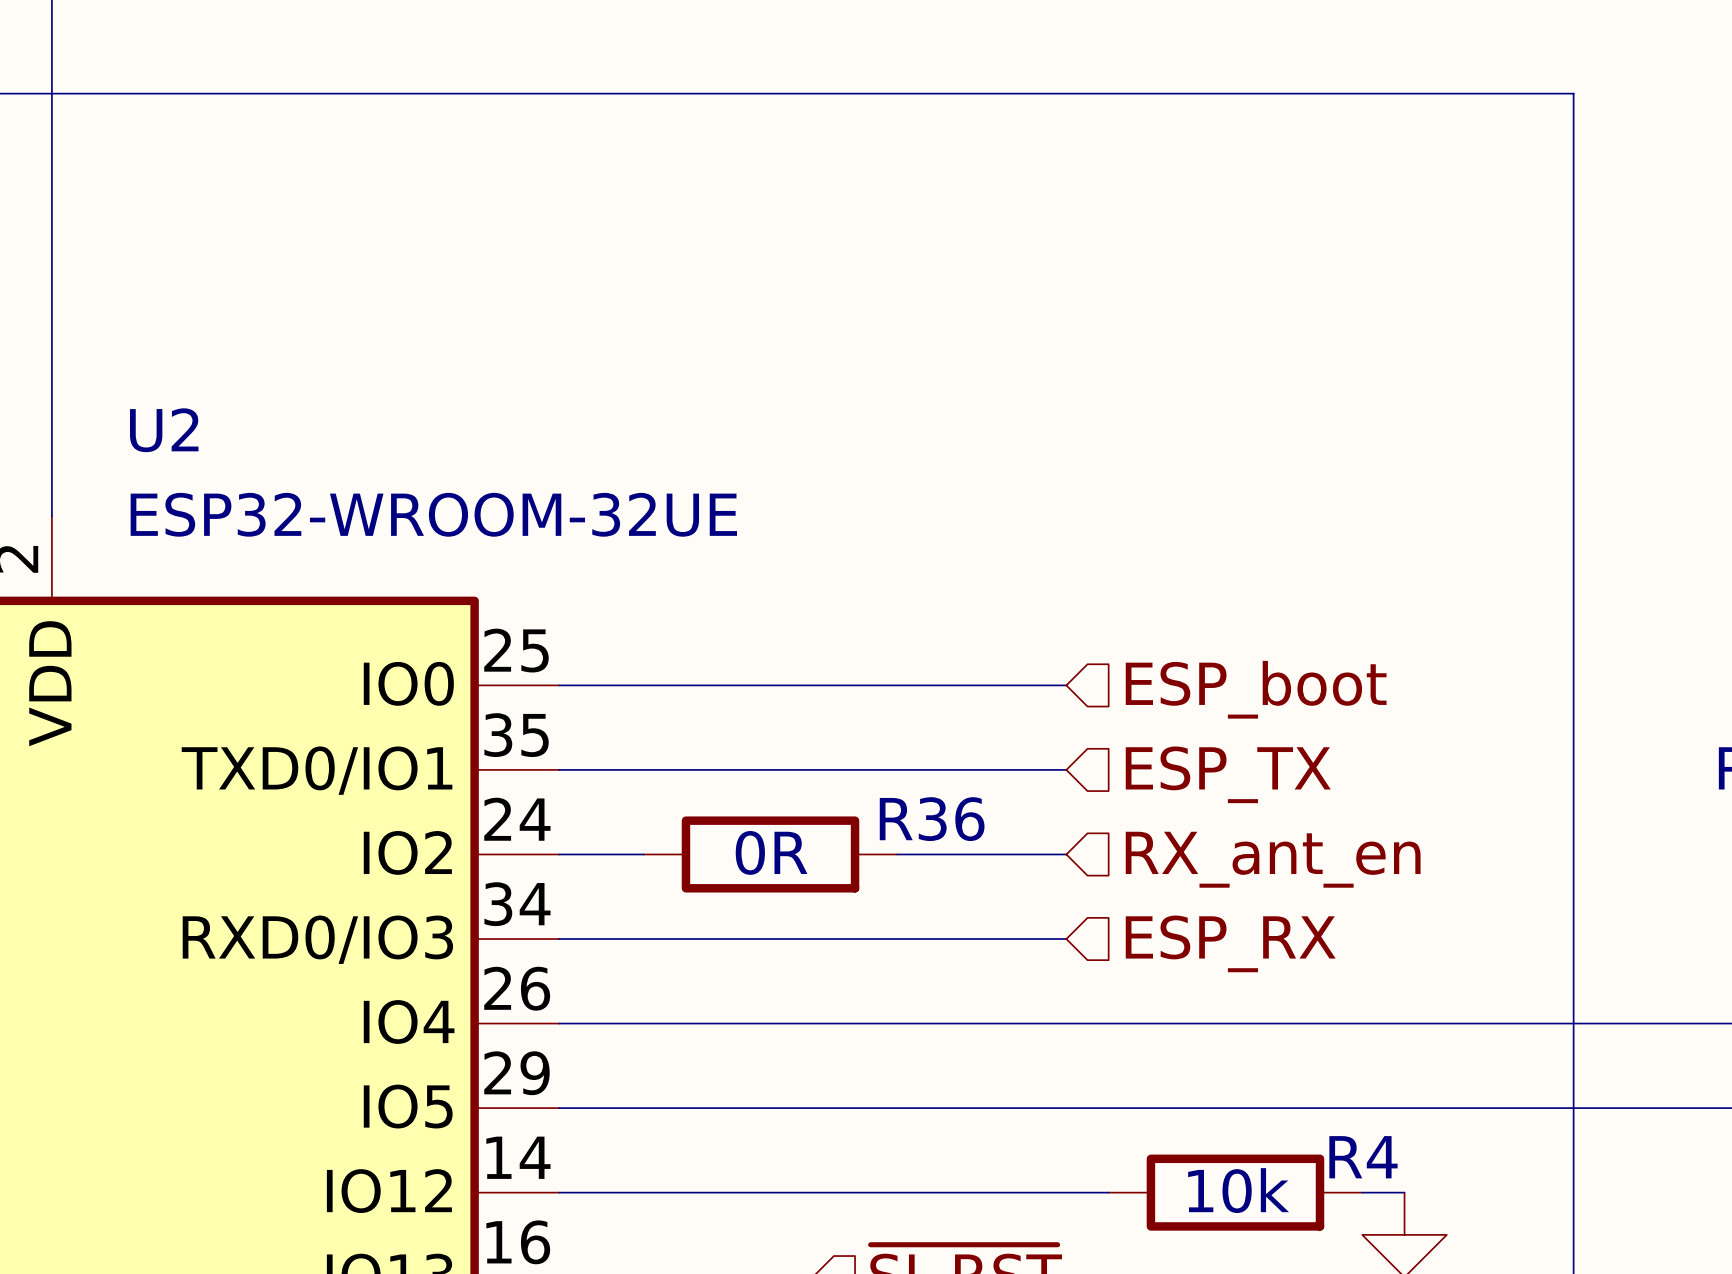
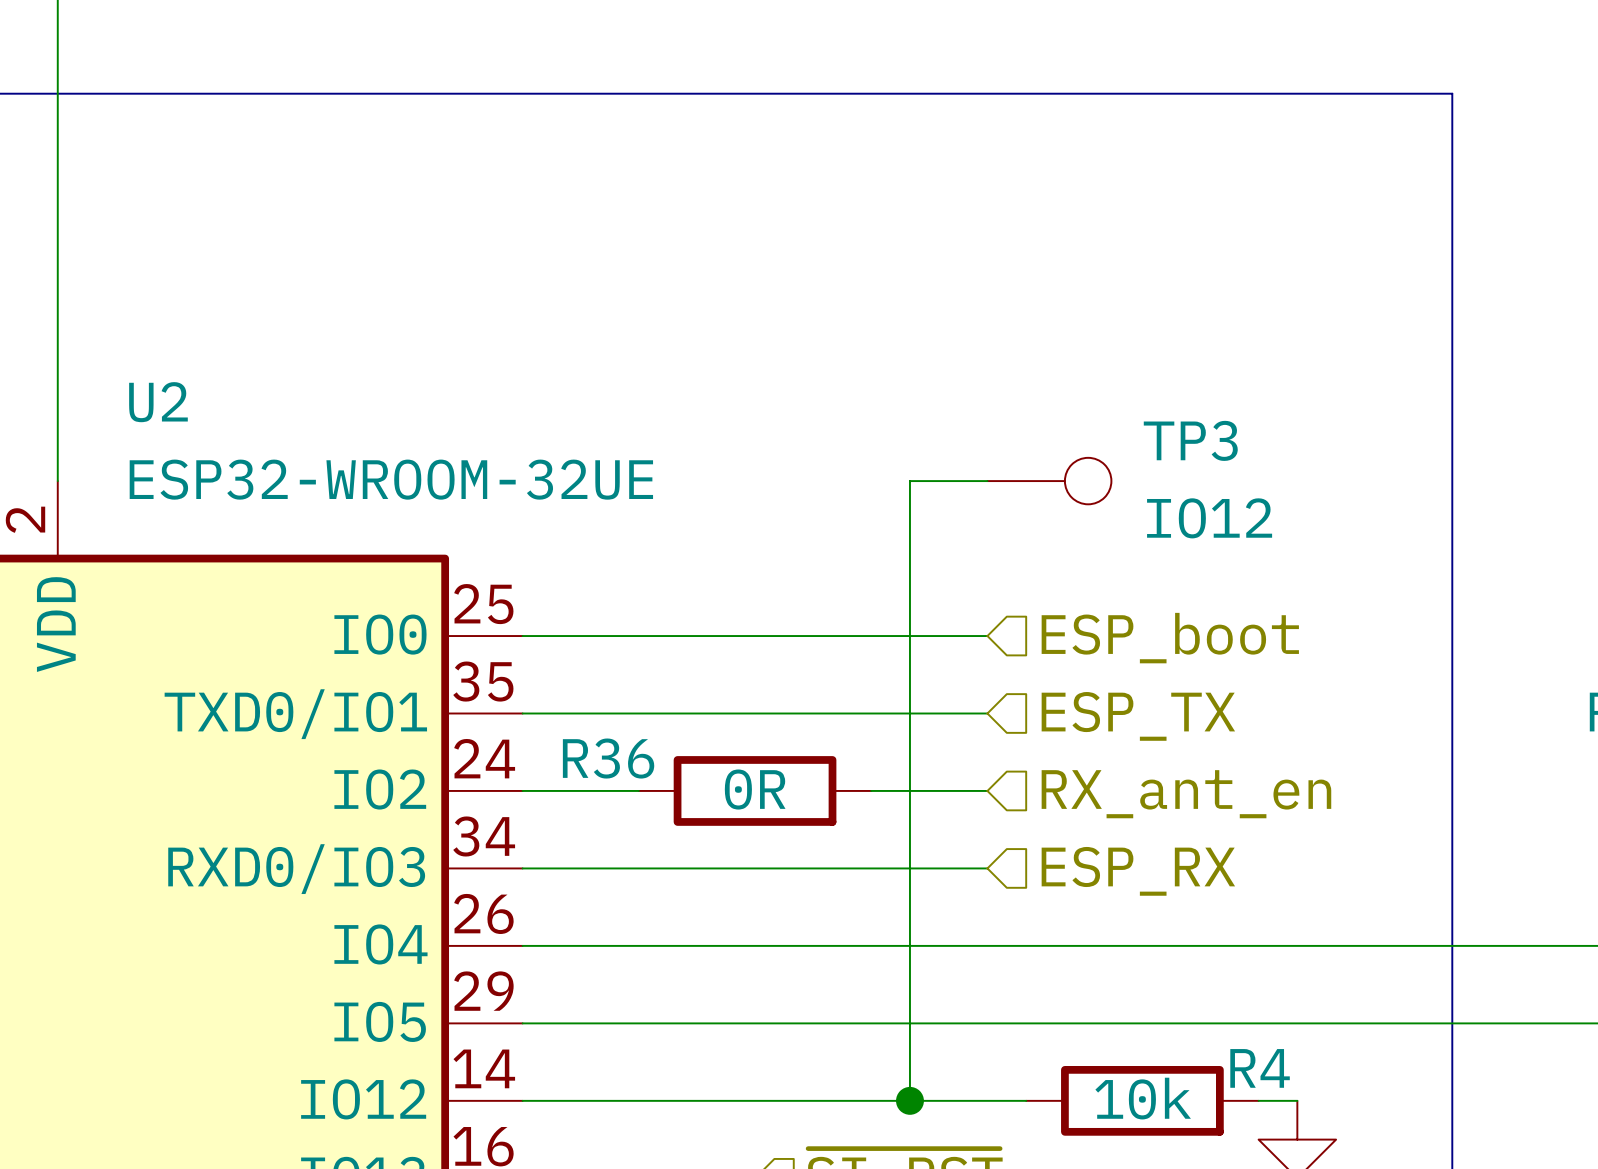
wire: none -> (987, 481) (909, 481) (909, 1100)
TP3: none -> IO12 (1049, 481)
R36 name position: R36 (932, 819) -> R36 (608, 758)
R36 position: (770, 854) -> (755, 790)
junction: none -> (909, 1100)

